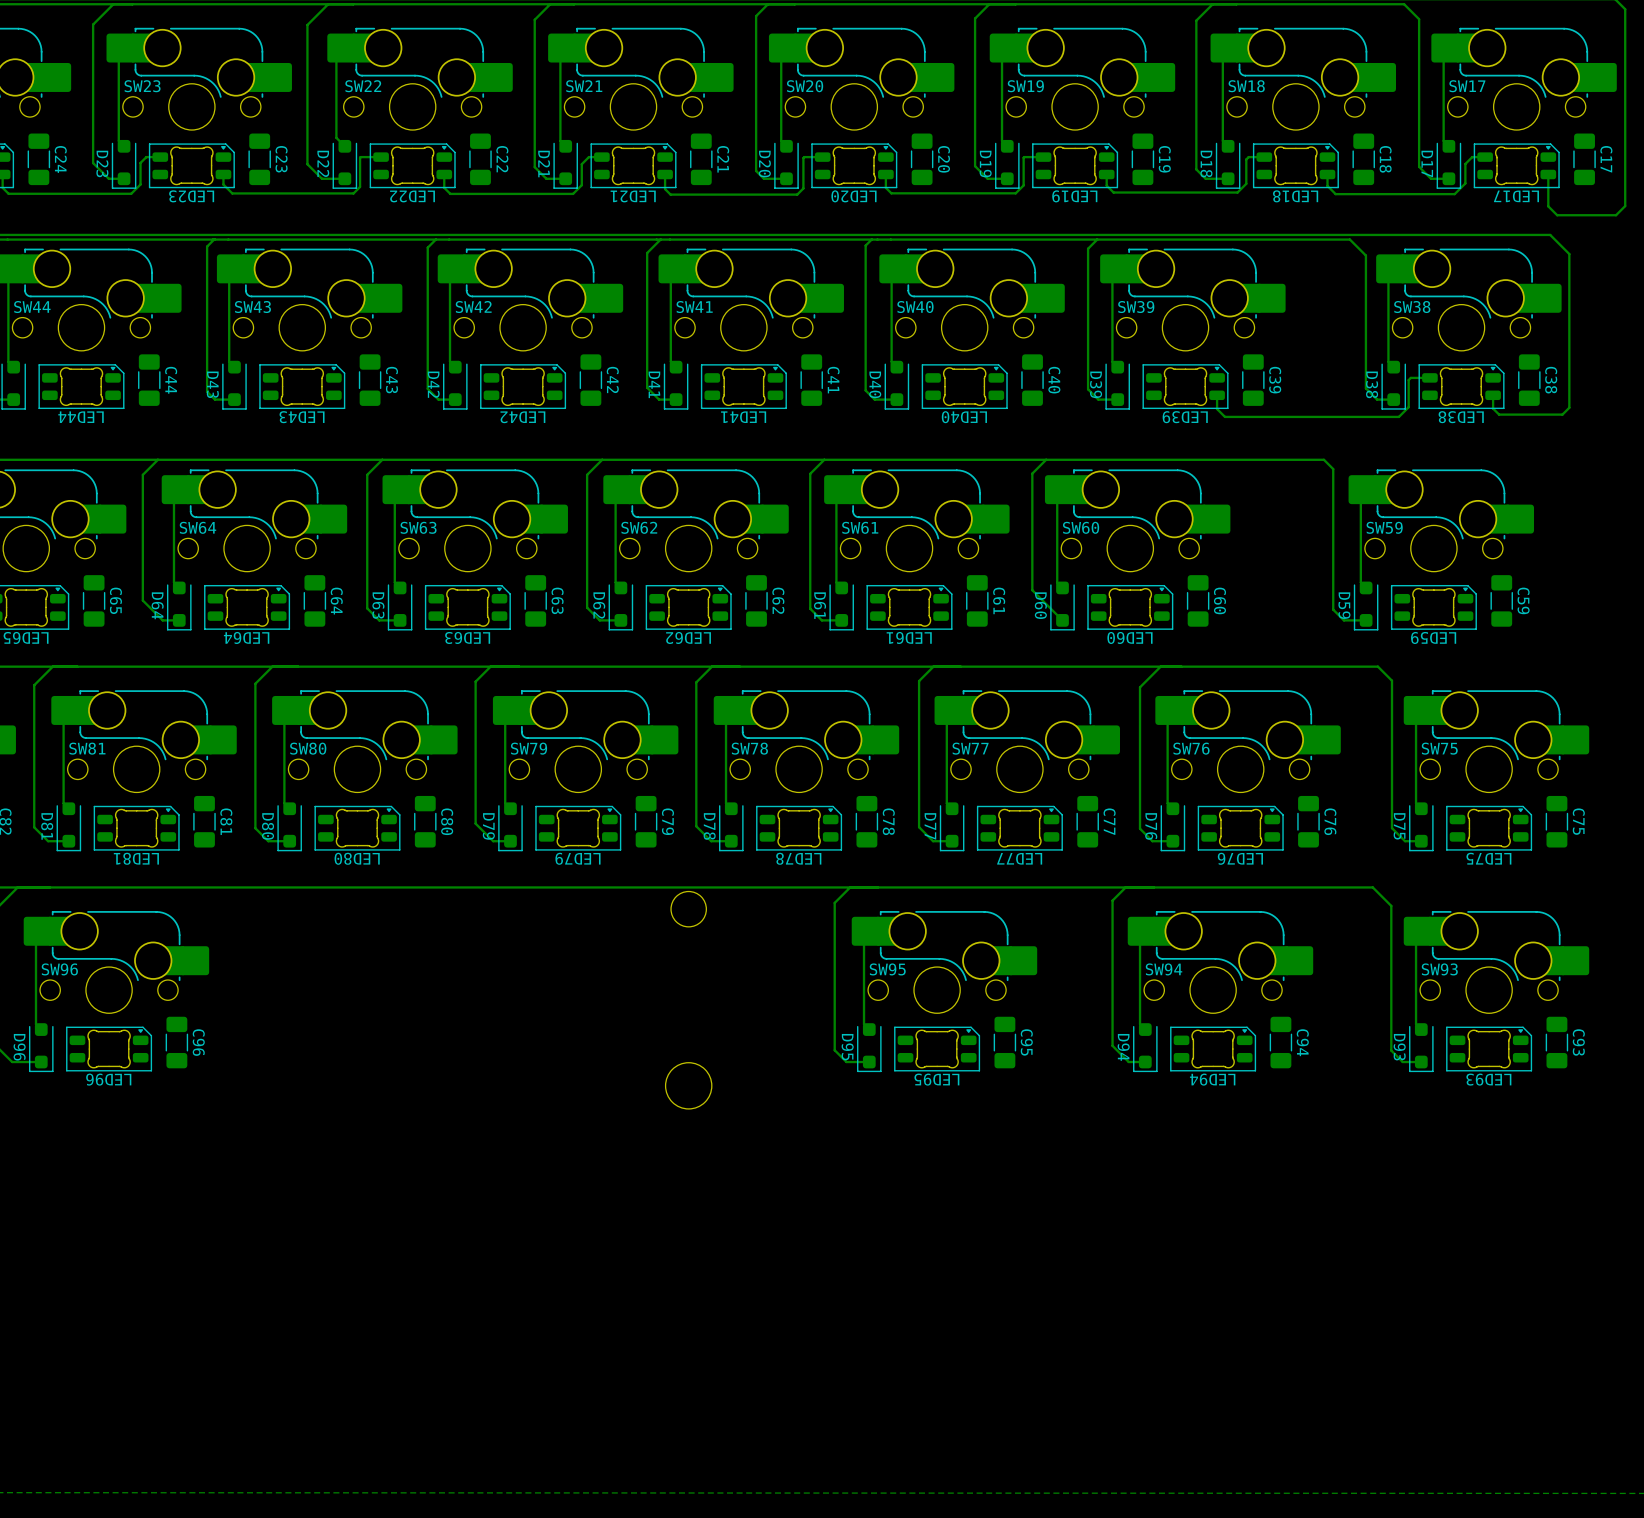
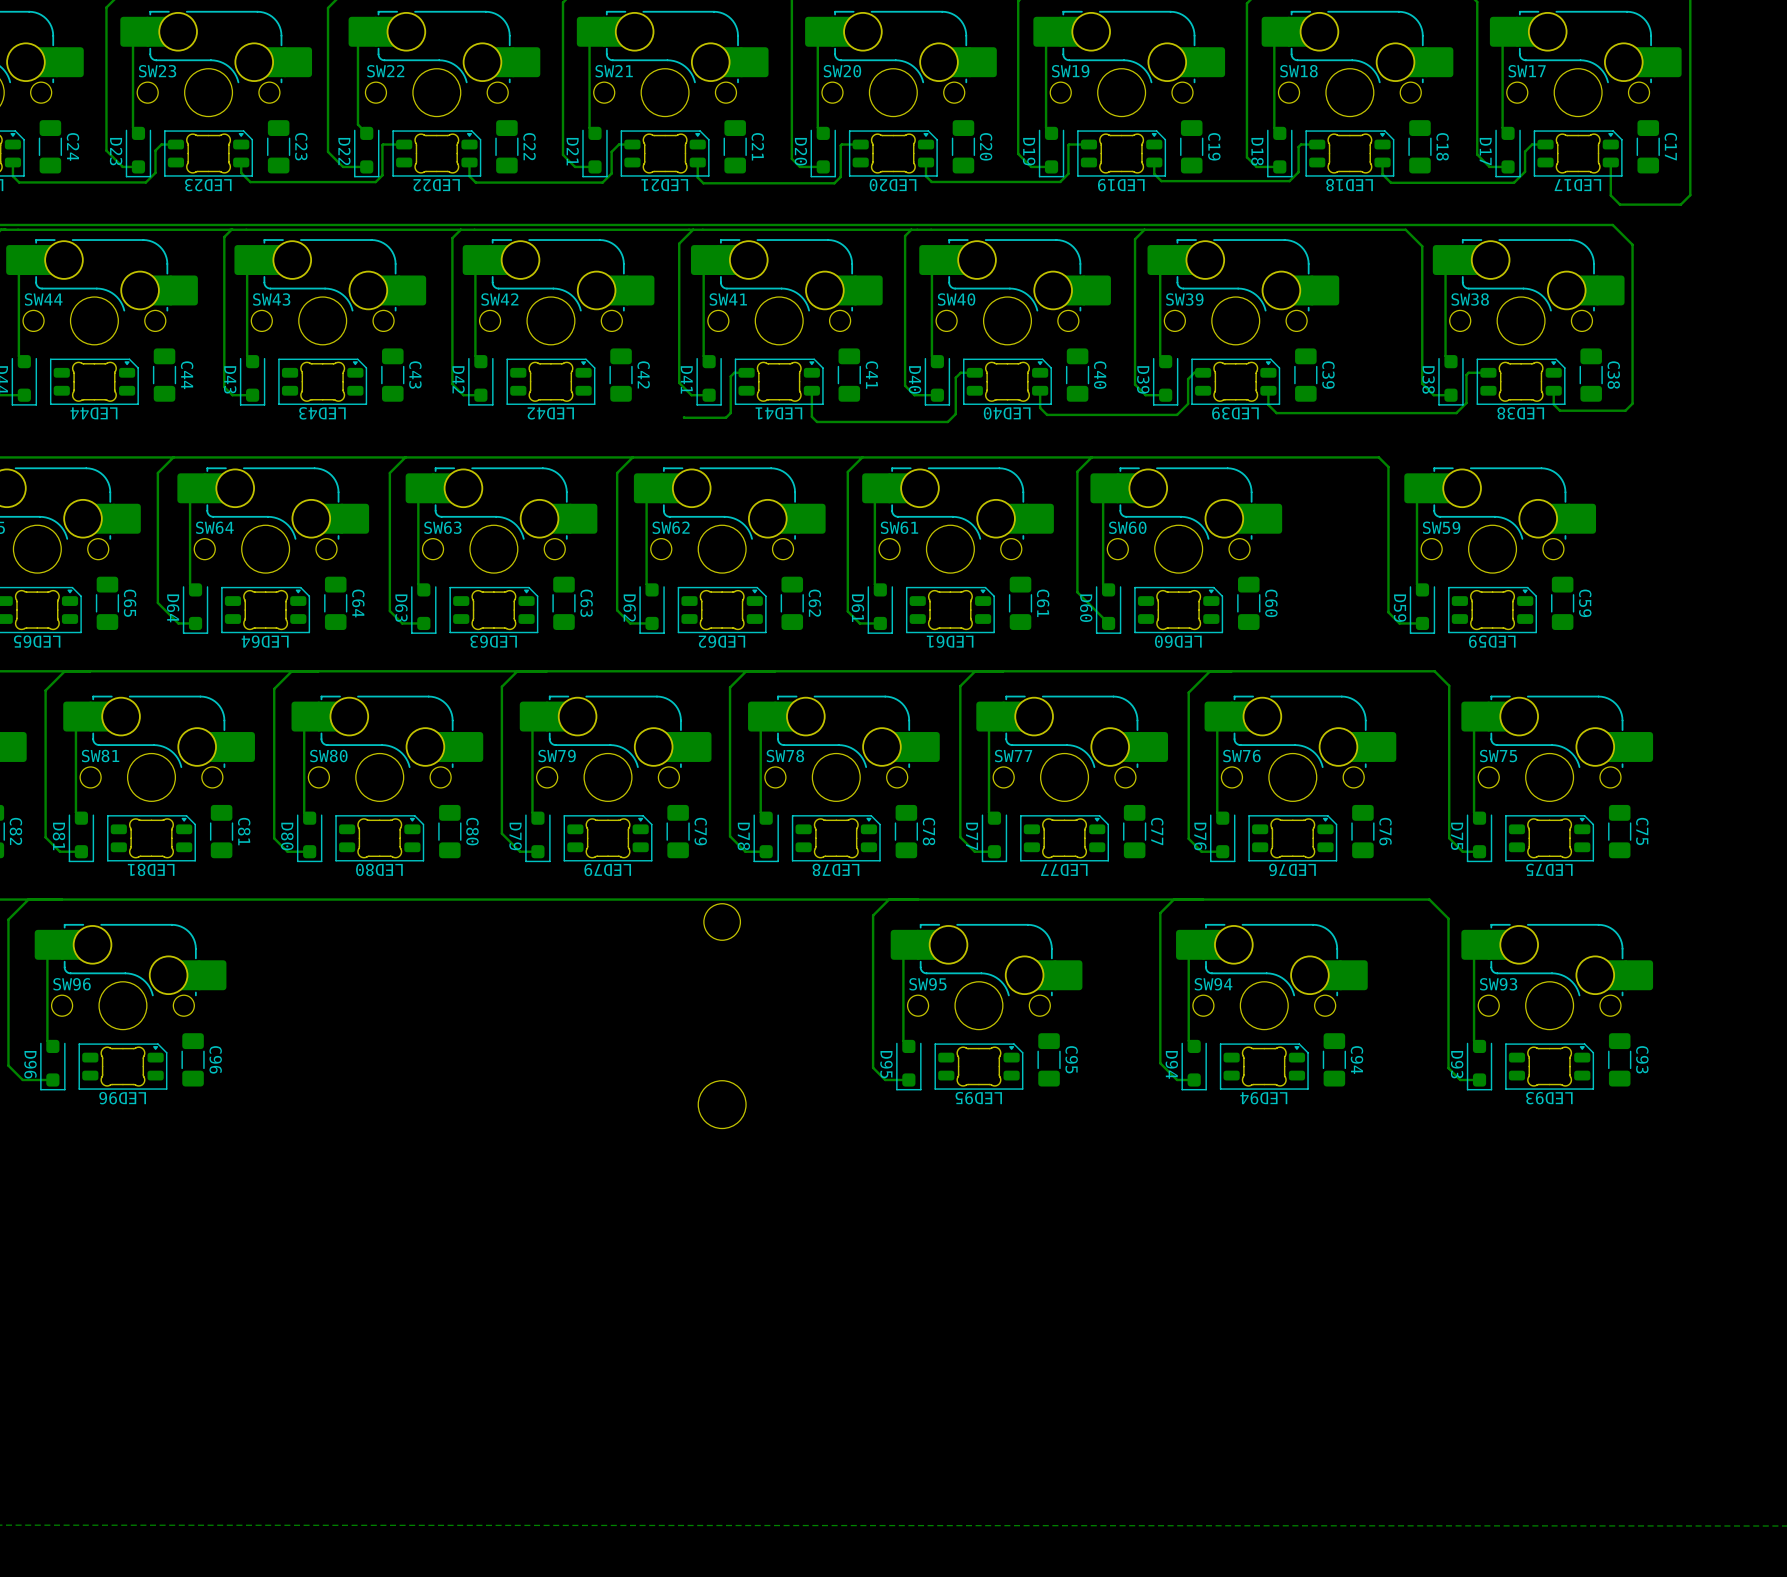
track: none -> (746, 372) (734, 372) (730, 376) (730, 412) (725, 417) (683, 417)
track: none -> (974, 372) (960, 372) (955, 377) (955, 414) (947, 421) (817, 421) (811, 416) (811, 390)
track: none -> (1203, 372) (1194, 372) (1188, 379) (1188, 403) (1177, 414) (1047, 414) (1040, 407) (1040, 390)

